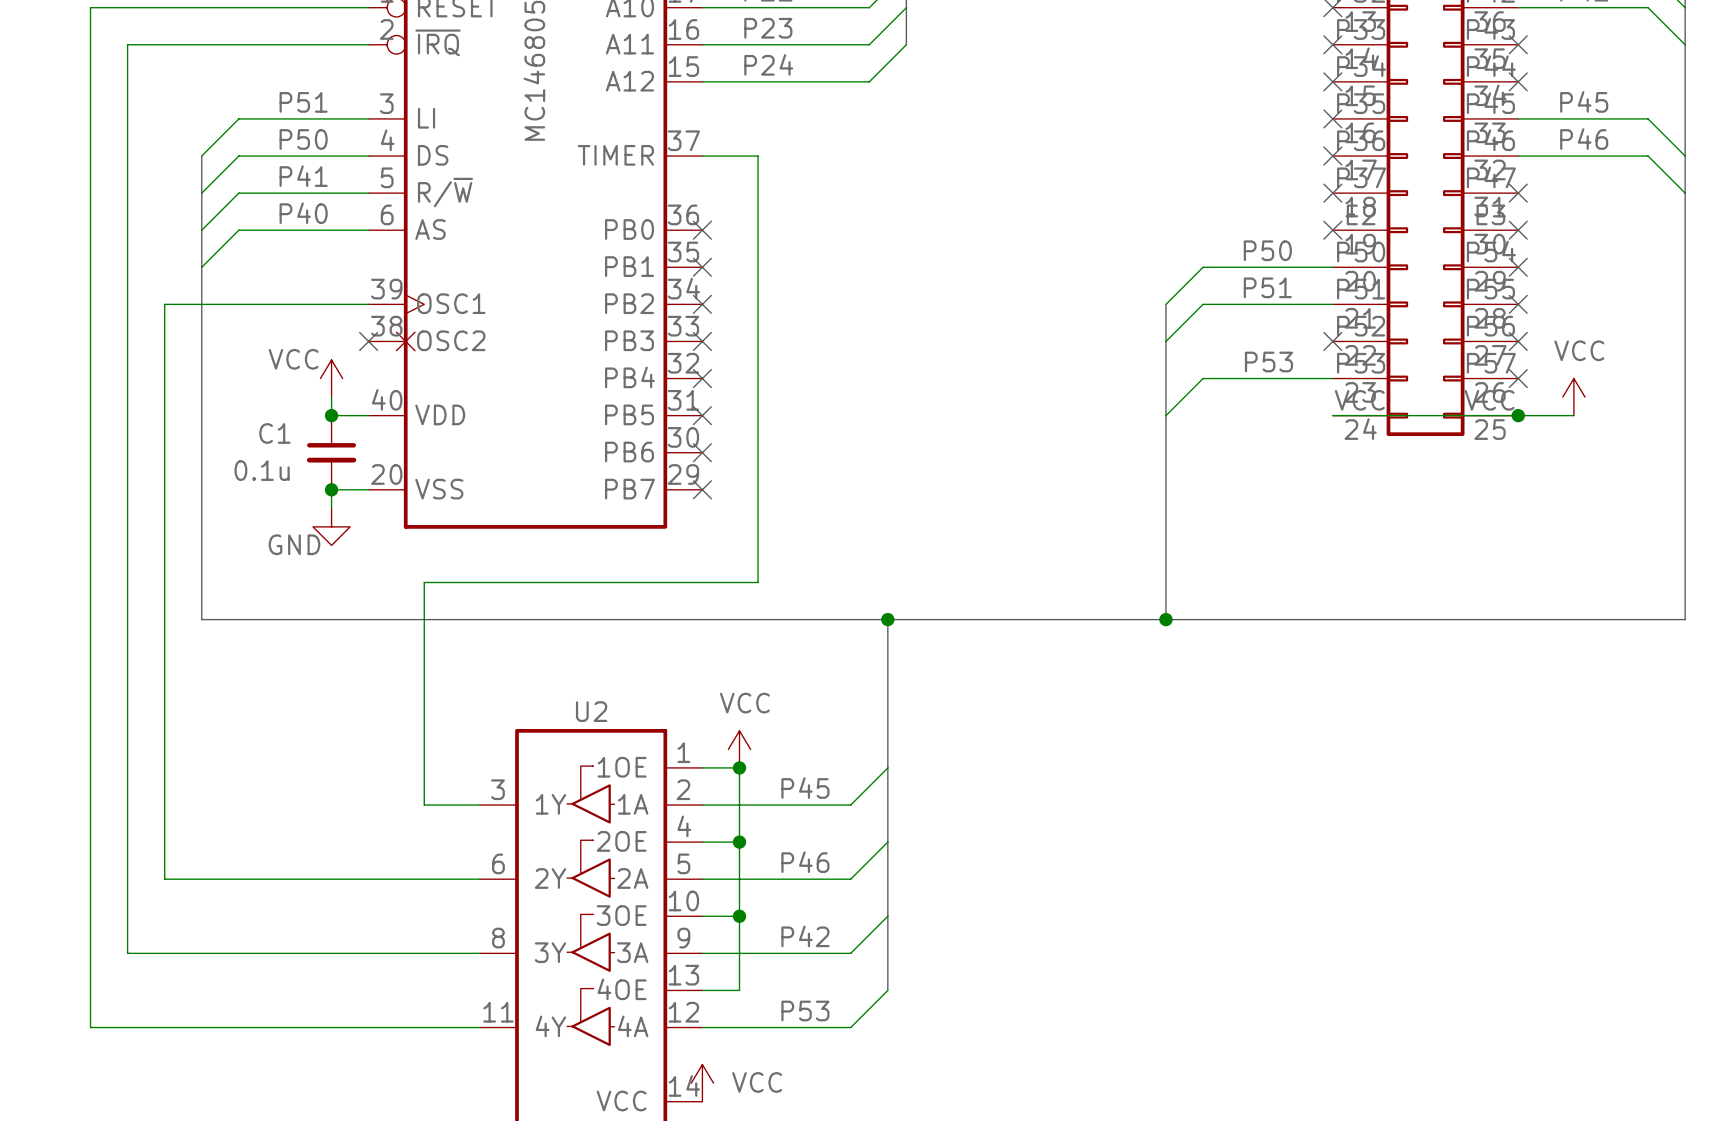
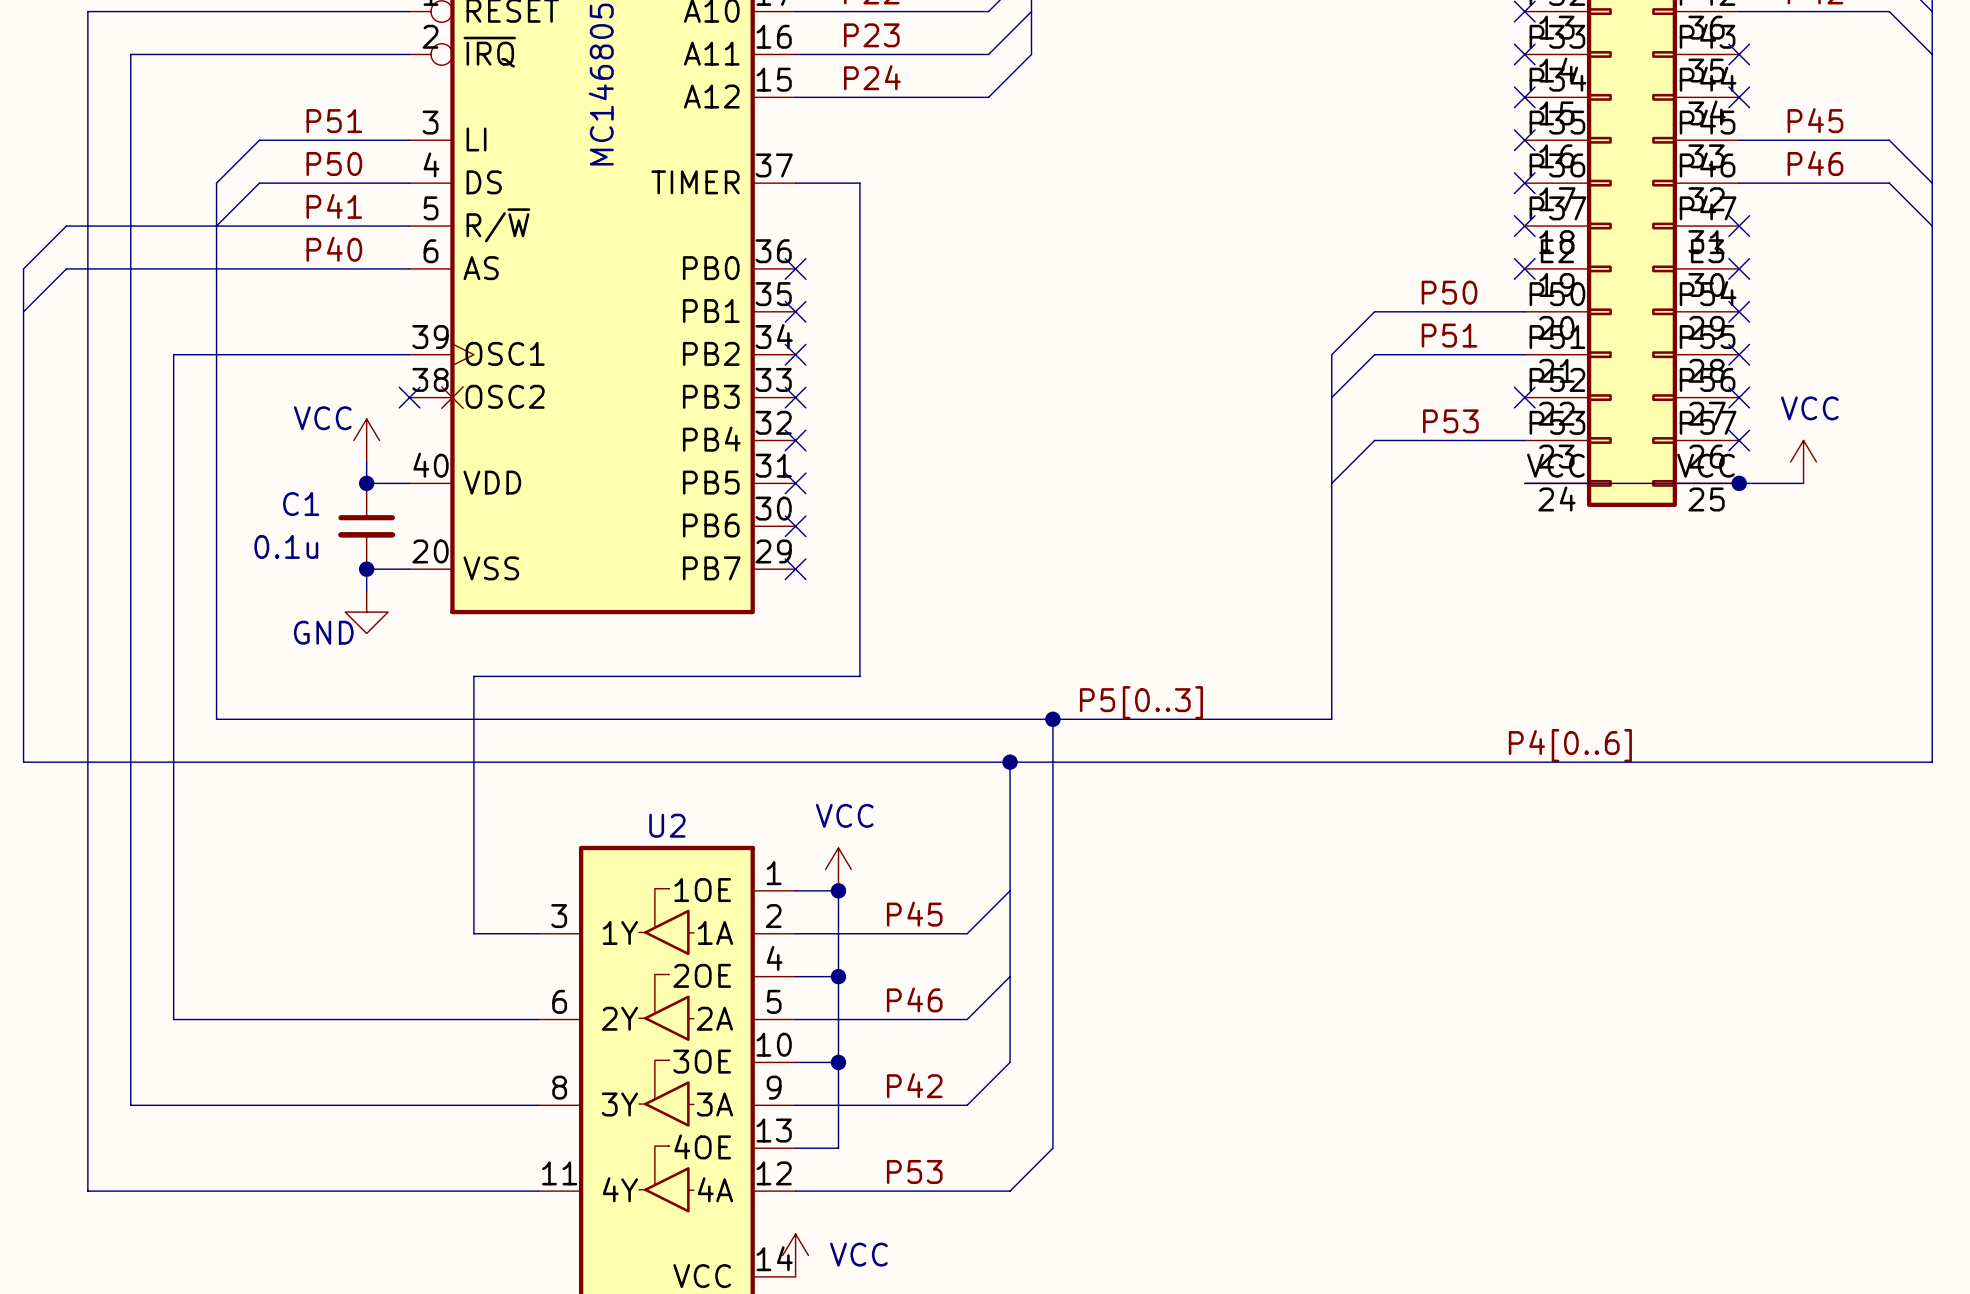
wire: (238, 193) (201, 230) -> (259, 226) (66, 226) (23, 268)
wire: (238, 230) (201, 267) -> (259, 268) (66, 268) (23, 311)
label: none -> P5[0..3] (1141, 702)
bus: (887, 619) (887, 656) -> none
junction: (887, 619) -> none
bus: none -> (1052, 719) (1052, 1148)
junction: none -> (1052, 719)
bus: (1165, 619) (1685, 619) -> (23, 268) (23, 762) (1932, 762) (1932, 719)
junction: (1165, 619) -> none
label: none -> P4[0..6] (1570, 745)
junction: none -> (1010, 762)
bus: (887, 916) (887, 990) -> none
wire: (887, 990) (850, 1027) -> (1052, 1148) (1010, 1191) (967, 1191)

